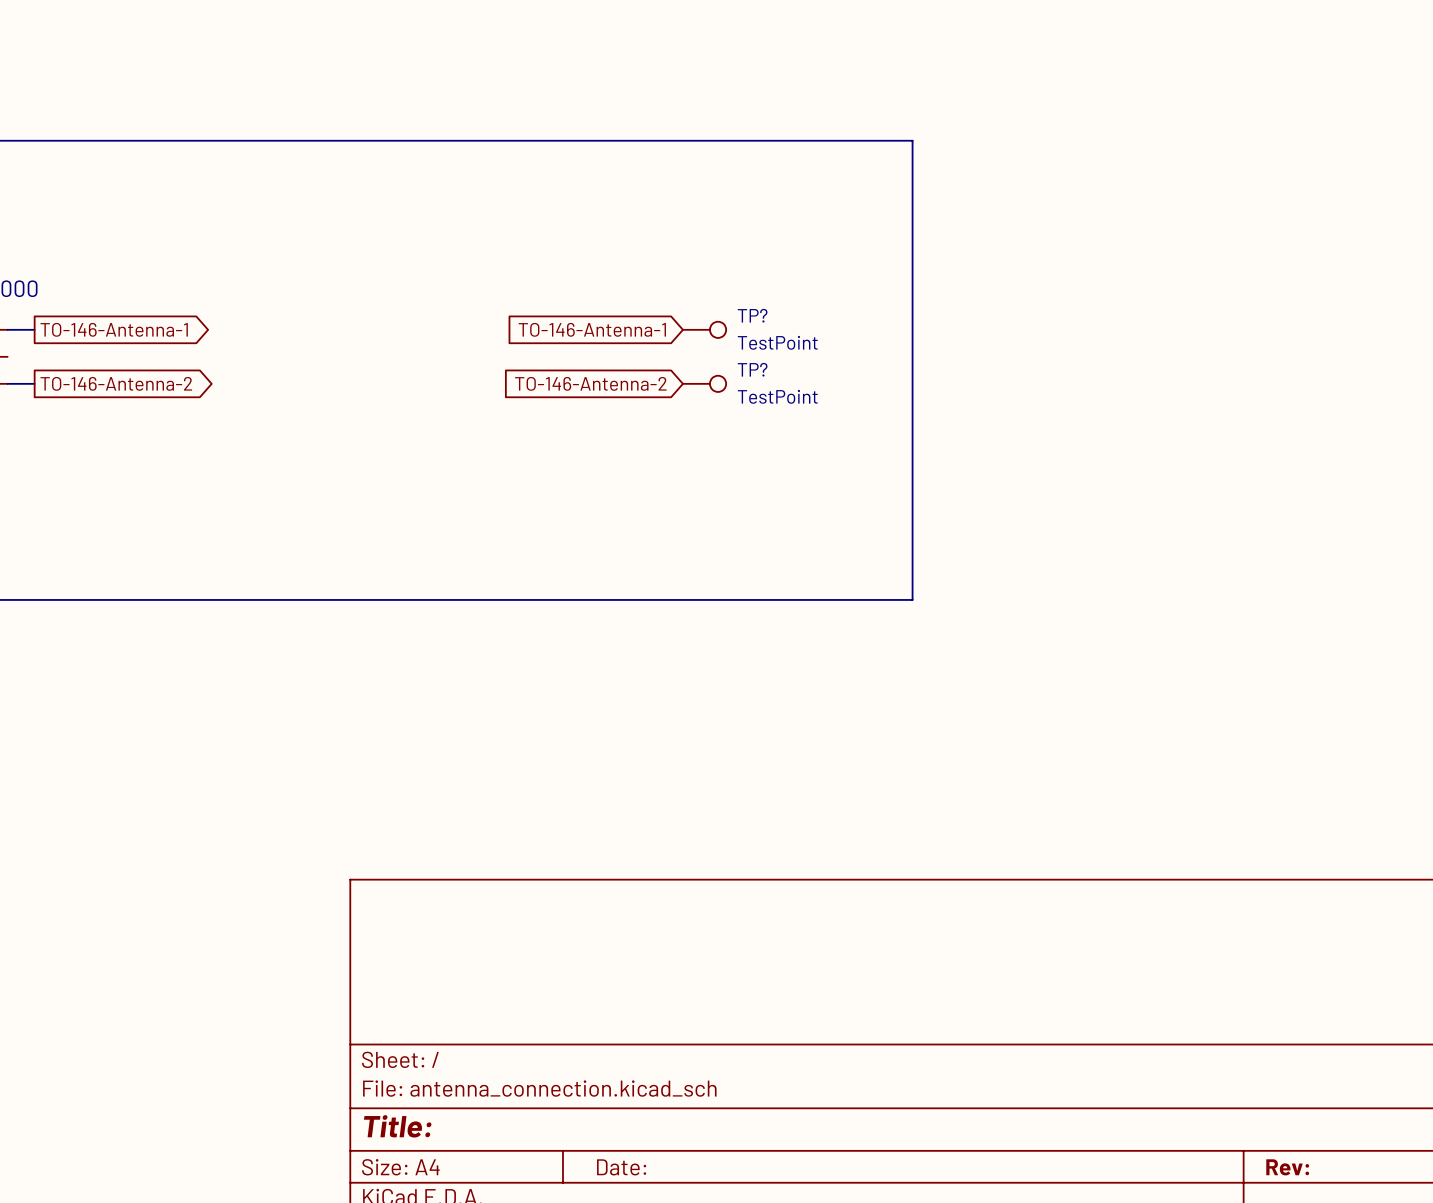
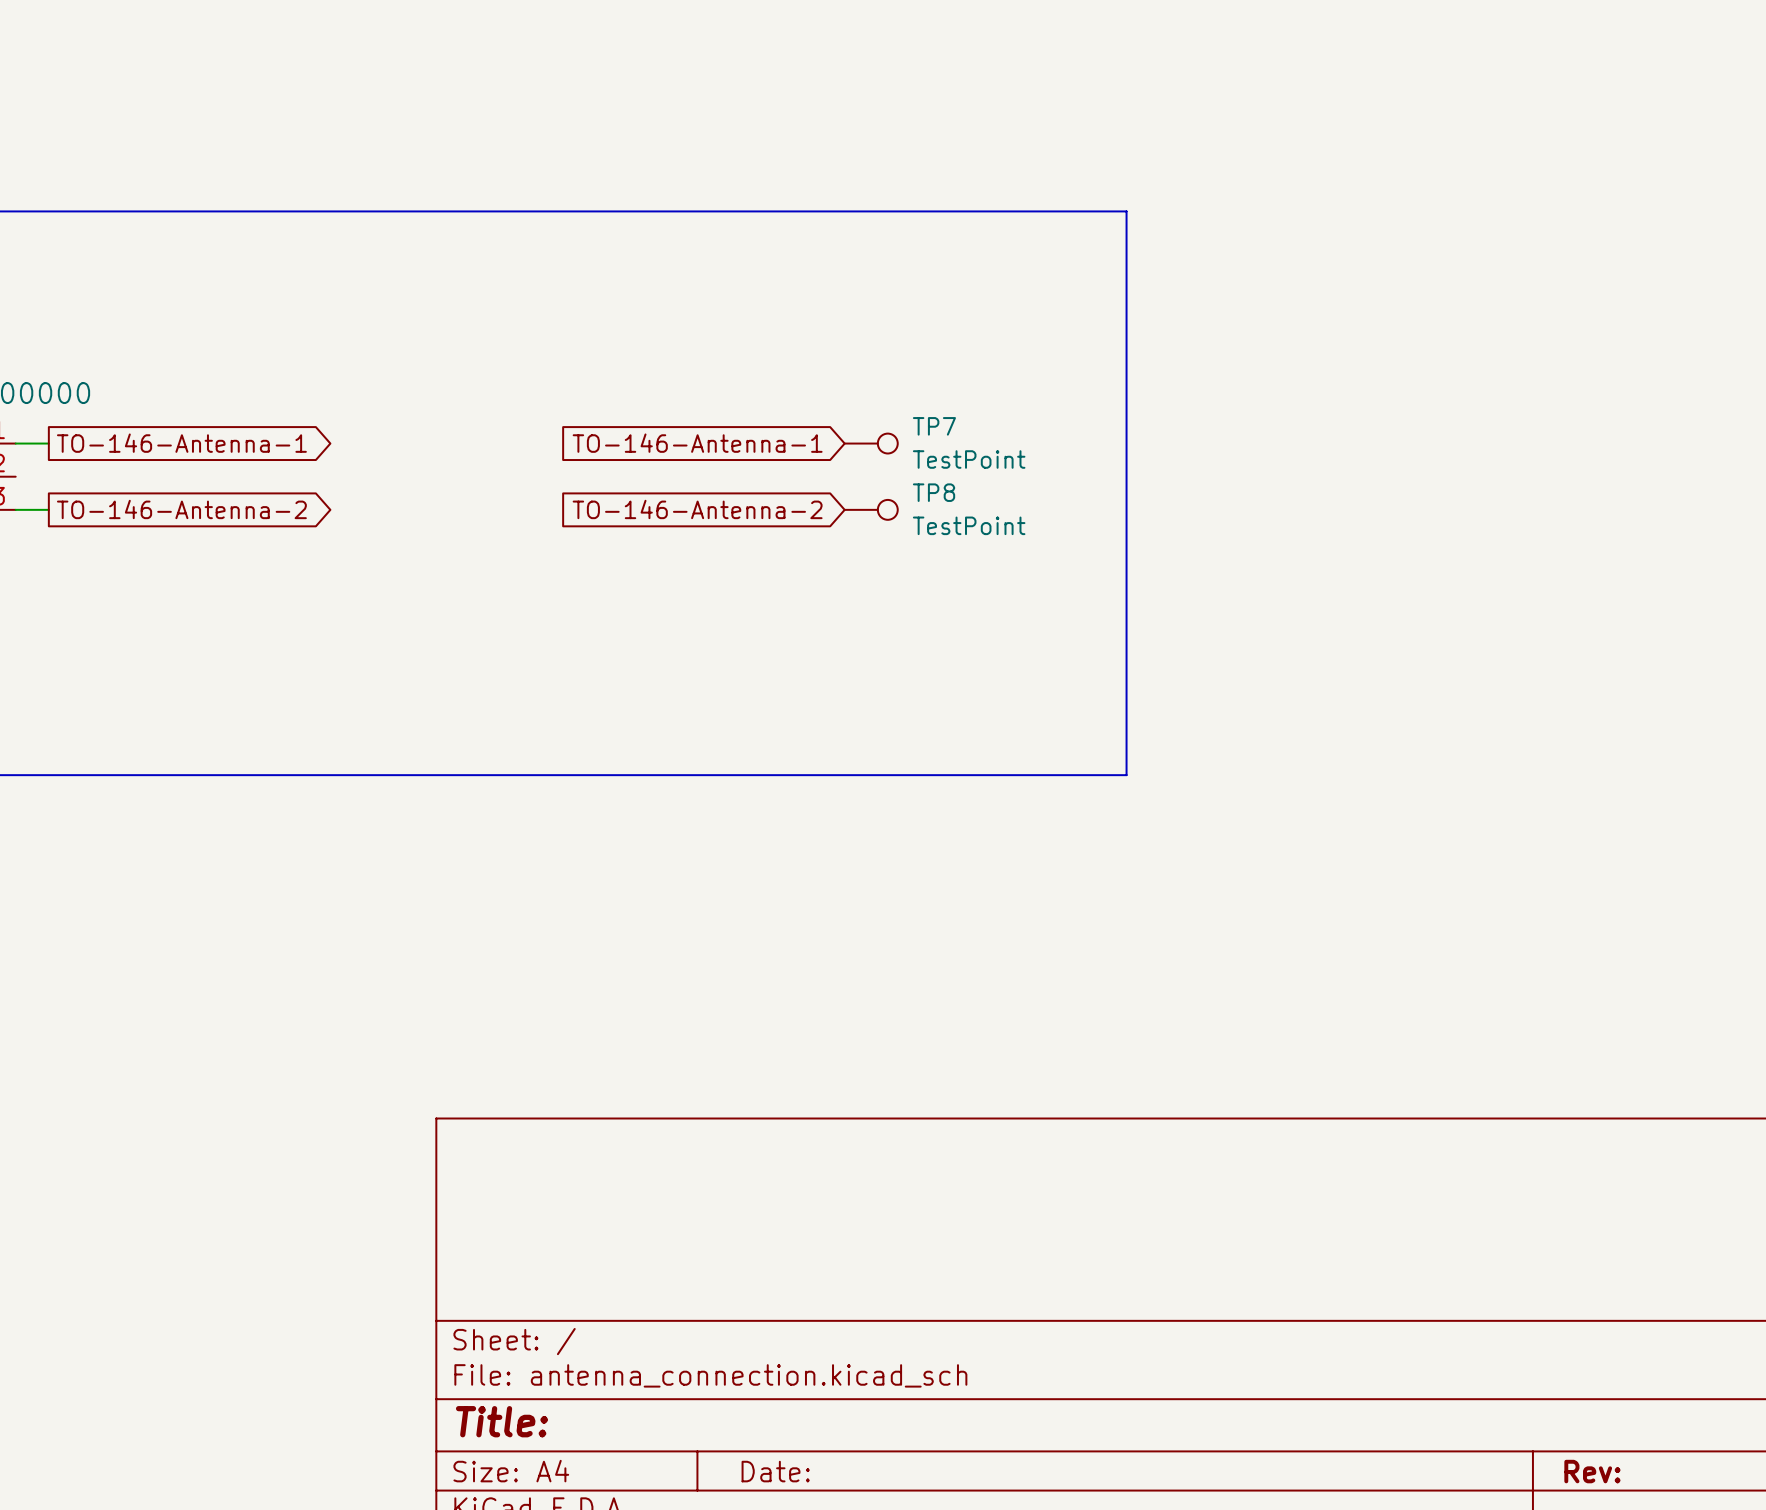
TP? name: TP? (752, 315) -> TP7 (934, 426)
TP? name: TP? (752, 369) -> TP8 (934, 492)

